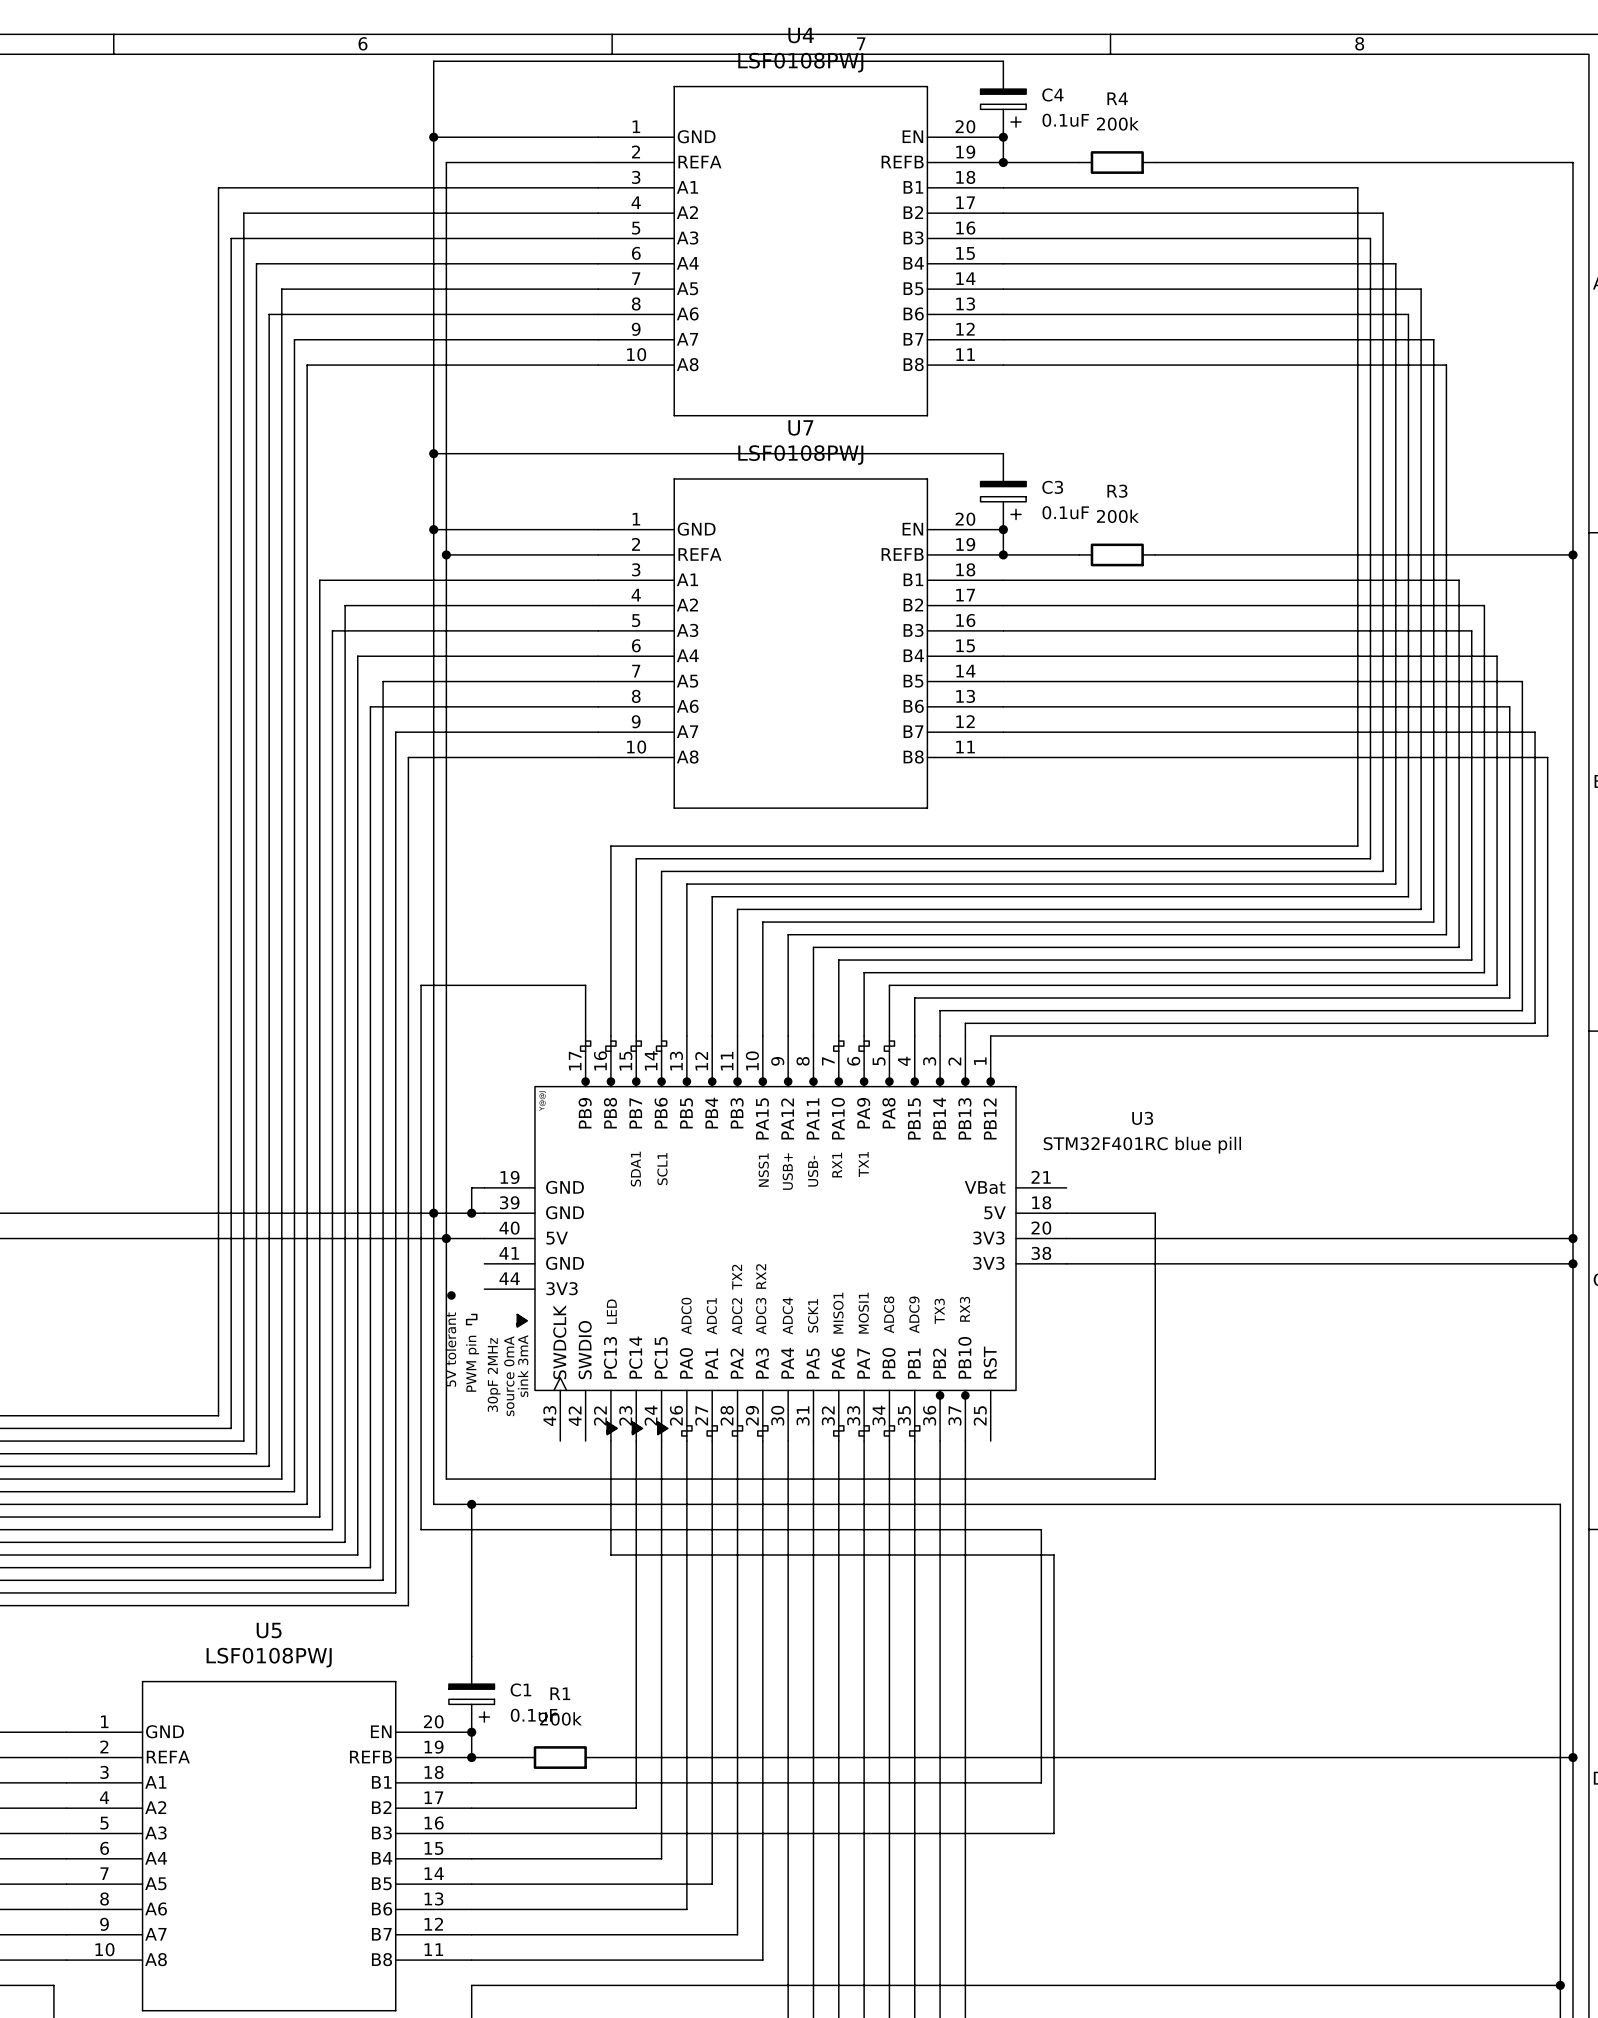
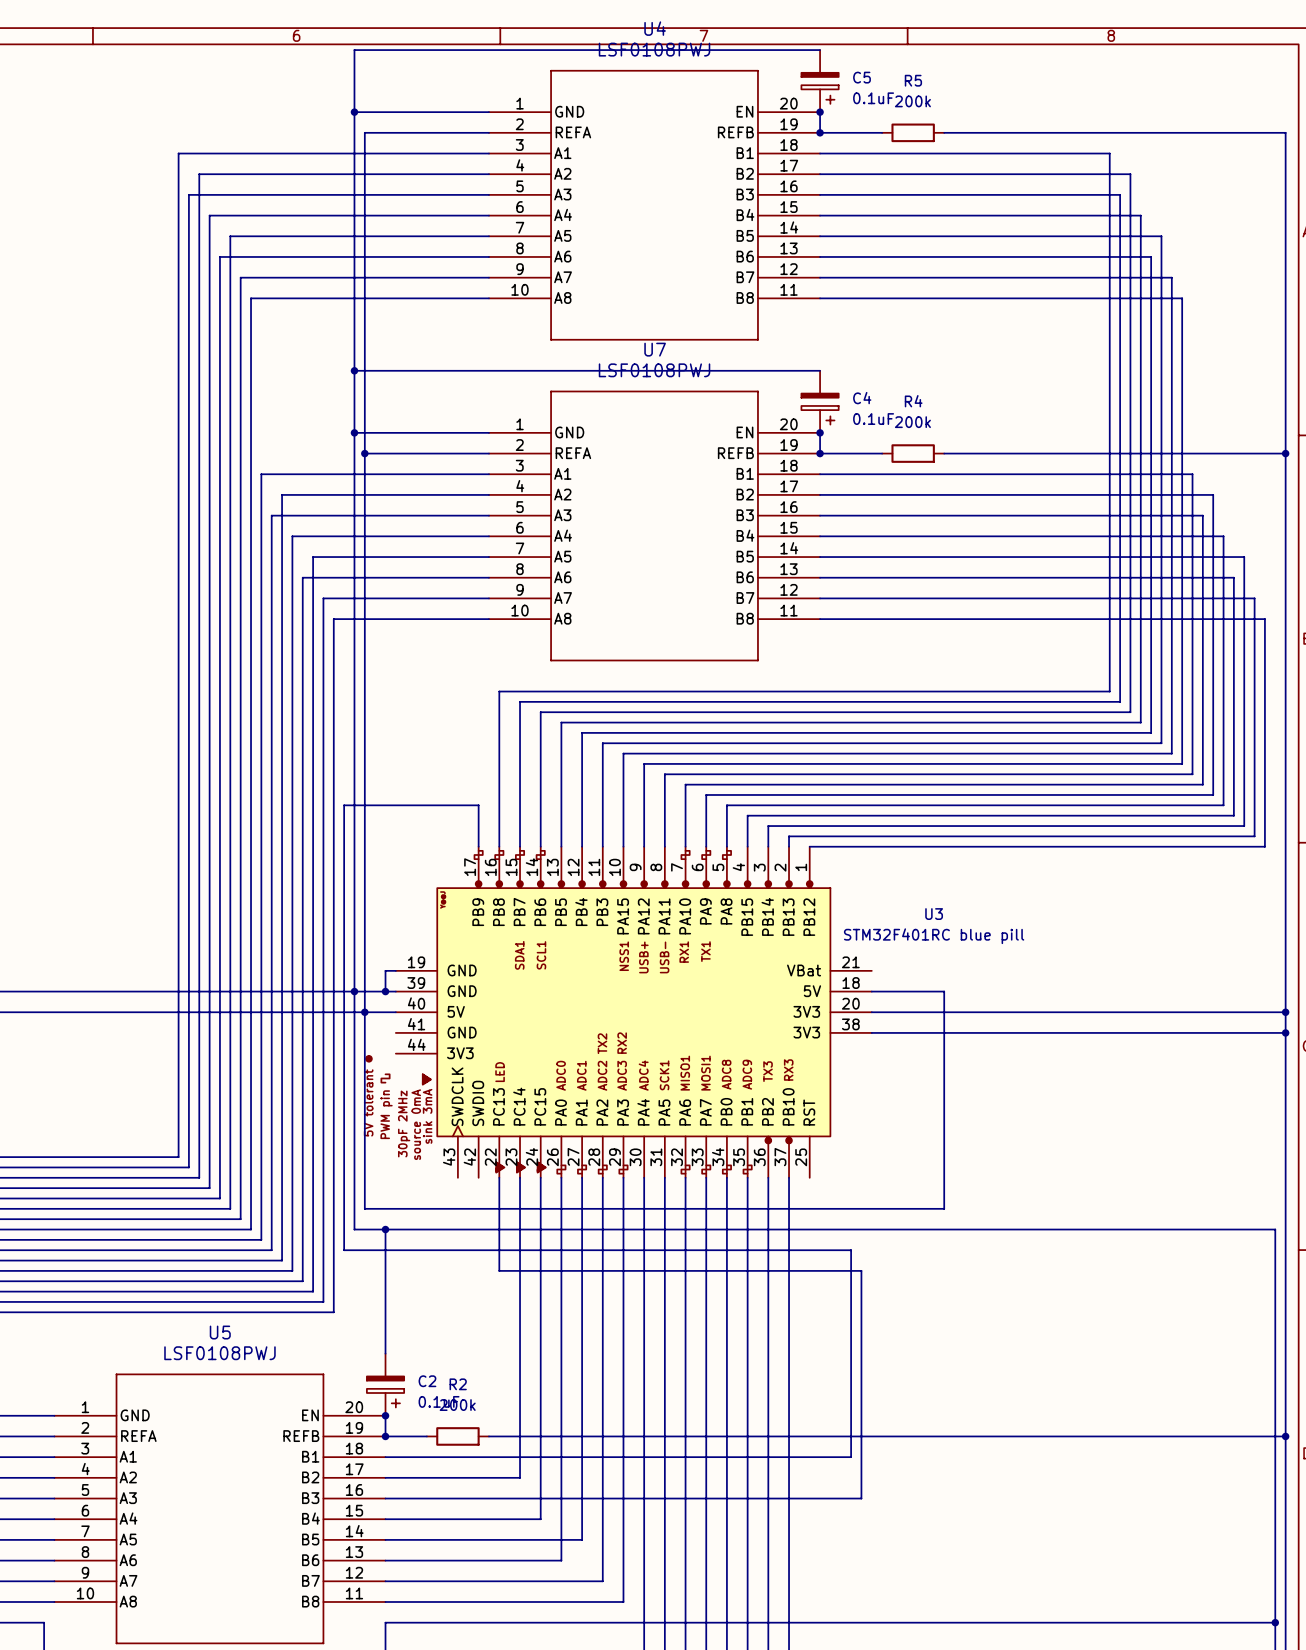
C4 name: C4 (1052, 94) -> C5 (862, 77)
R4 name: R4 (1117, 98) -> R5 (913, 80)
C3 name: C3 (1052, 487) -> C4 (862, 398)
R3 name: R3 (1117, 491) -> R4 (913, 401)
C1 name: C1 (520, 1689) -> C2 (427, 1381)
R1 name: R1 (560, 1693) -> R2 (458, 1384)

